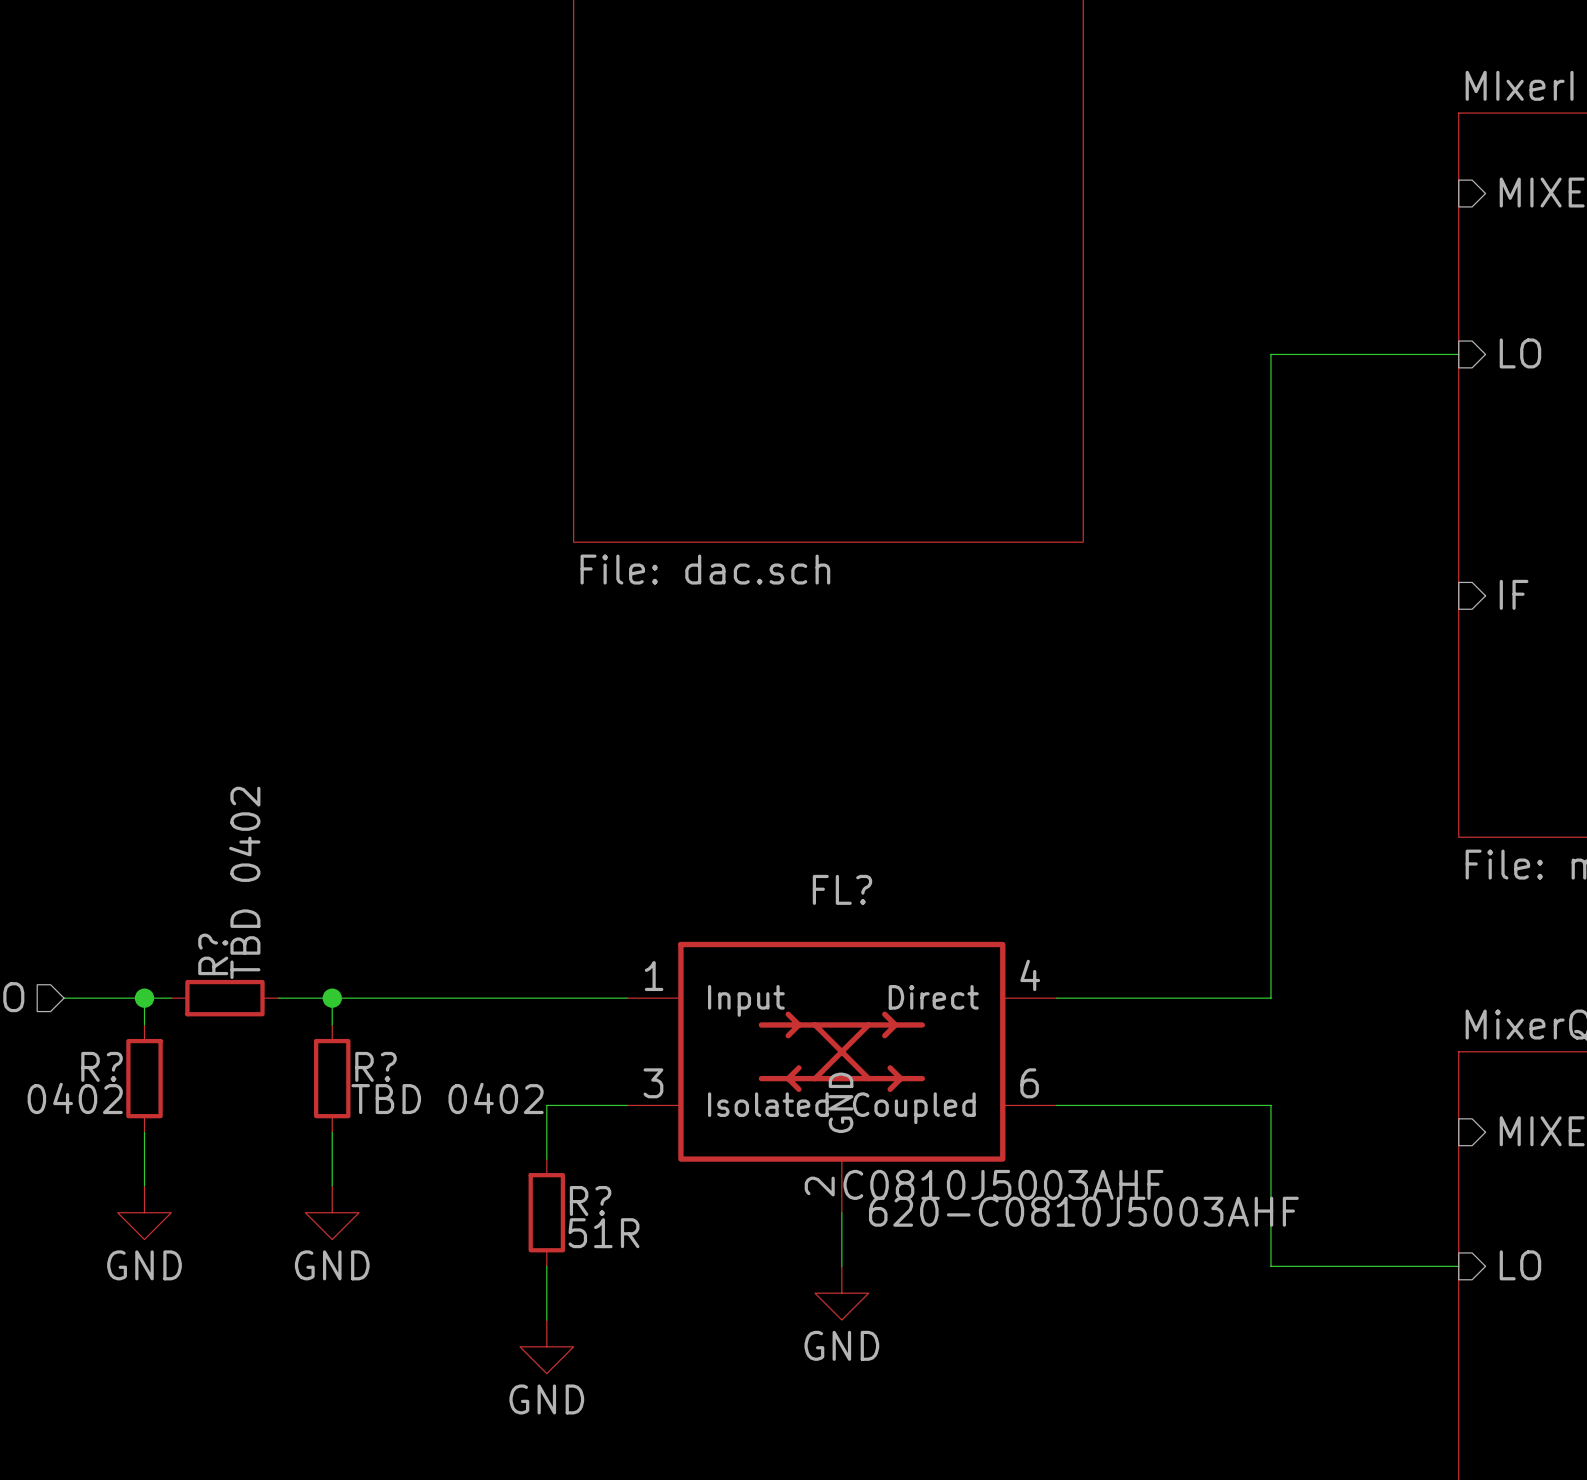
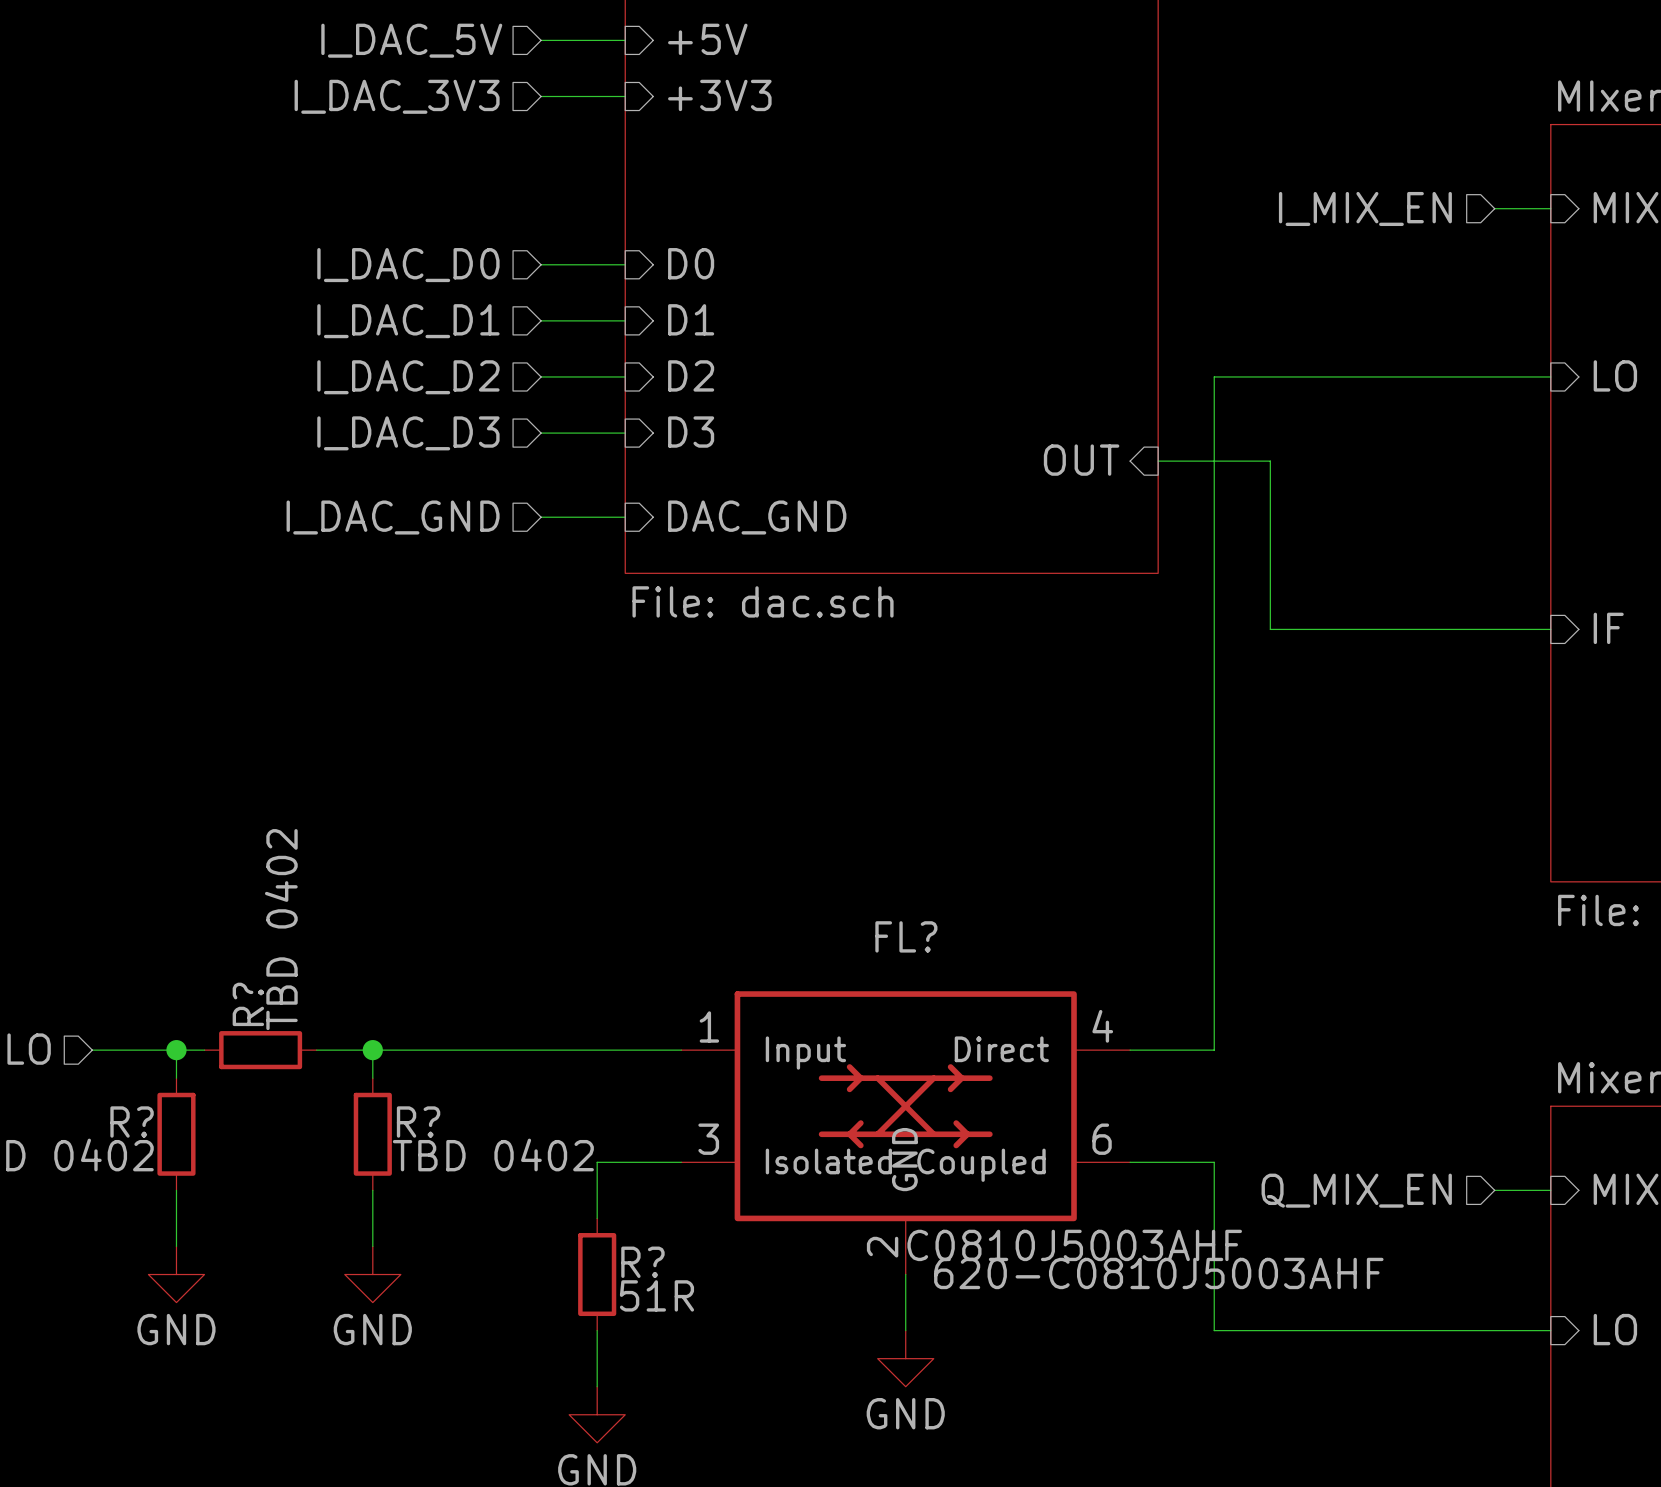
sheet pin: none -> +5V (707, 39)
hierarchical label: none -> I_DAC_5V (411, 40)
wire: none -> (541, 40) (625, 40)
sheet pin: none -> +3V3 (719, 95)
hierarchical label: none -> I_DAC_3V3 (397, 96)
wire: none -> (541, 96) (625, 96)
hierarchical label: none -> I_MIX_EN (1365, 208)
wire: none -> (1494, 208) (1550, 208)
sheet pin: none -> D0 (691, 263)
hierarchical label: none -> I_DAC_D0 (408, 265)
wire: none -> (541, 264) (625, 264)
sheet pin: none -> D1 (691, 319)
wire: none -> (541, 320) (625, 320)
hierarchical label: none -> I_DAC_D1 (408, 321)
sheet pin: none -> D2 (691, 375)
hierarchical label: none -> I_DAC_D2 (408, 377)
wire: none -> (541, 376) (625, 376)
wire: (1270, 354) (1270, 998) (1136, 998) -> (1354, 376) (1214, 376) (1214, 1050)
sheet pin: none -> D3 (691, 432)
hierarchical label: none -> I_DAC_D3 (408, 433)
wire: none -> (541, 433) (625, 433)
sheet pin: none -> OUT (1081, 460)
wire: none -> (1158, 461) (1270, 461) (1270, 629) (1550, 629)
hierarchical label: none -> I_DAC_GND (393, 517)
wire: none -> (541, 517) (625, 517)
sheet pin: none -> DAC_GND (757, 517)
wire: (1136, 1105) (1270, 1105) (1270, 1266) -> (1214, 1162) (1214, 1330) (1354, 1330)
hierarchical label: none -> Q_MIX_EN (1356, 1190)
wire: none -> (1494, 1190) (1550, 1190)

